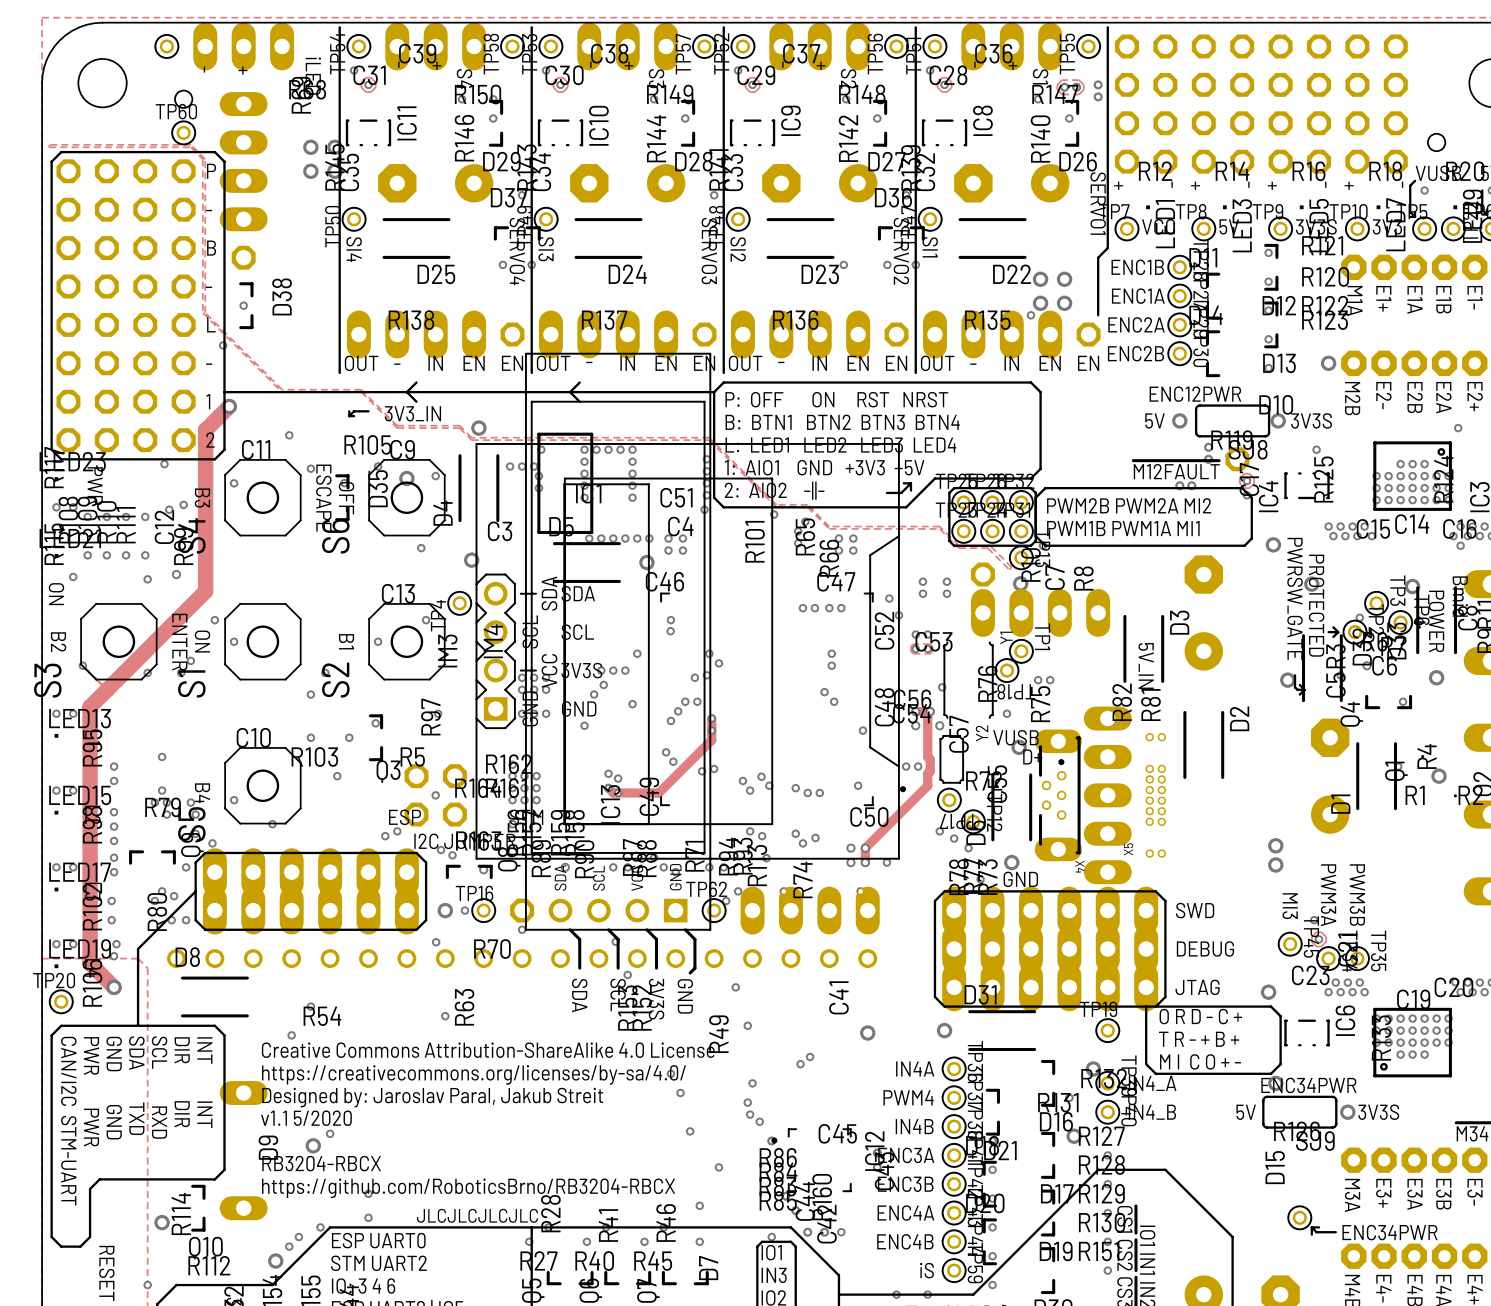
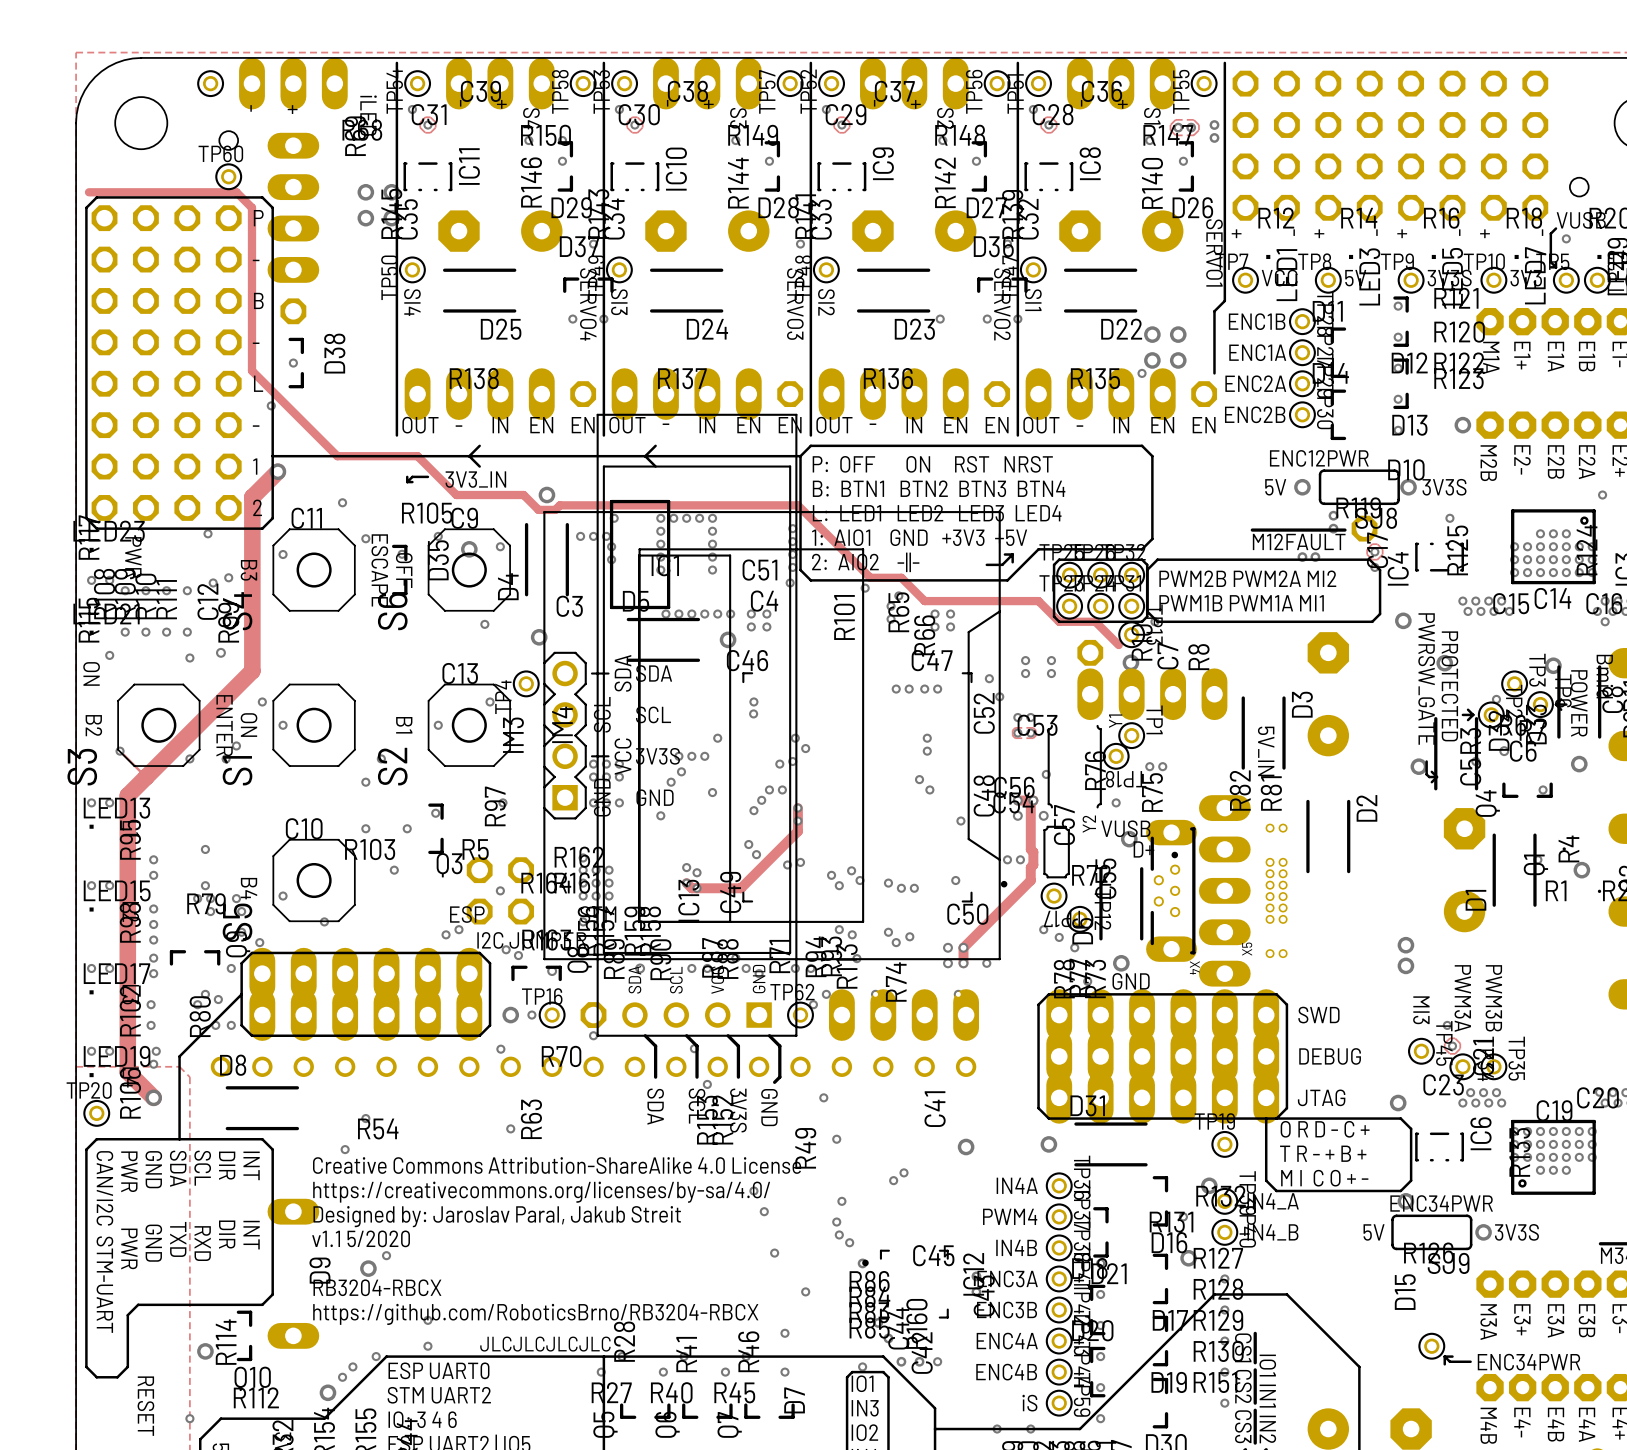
zone outline: (49, 144) (190, 144) (205, 159) (205, 312) (282, 389) (361, 389) (397, 425) (459, 425) (471, 437) (709, 437) (776, 504) (807, 504) (829, 526) (939, 526) (958, 545) (990, 545) (1011, 567) (1009, 569) (987, 548) (958, 548) (939, 528) (829, 528) (807, 507) (776, 507) (709, 440) (471, 440) (459, 428) (397, 428) (361, 392) (282, 392) (202, 312) (202, 159) (190, 147) (49, 147) (49, 144) -> none
track: none -> (89, 192) (236, 192) (252, 207) (252, 370) (337, 456) (417, 456) (456, 495) (523, 495) (538, 509) (555, 509) (559, 505) (797, 505) (870, 577) (901, 577) (924, 601) (1038, 601) (1059, 621) (1095, 621) (1118, 645)

